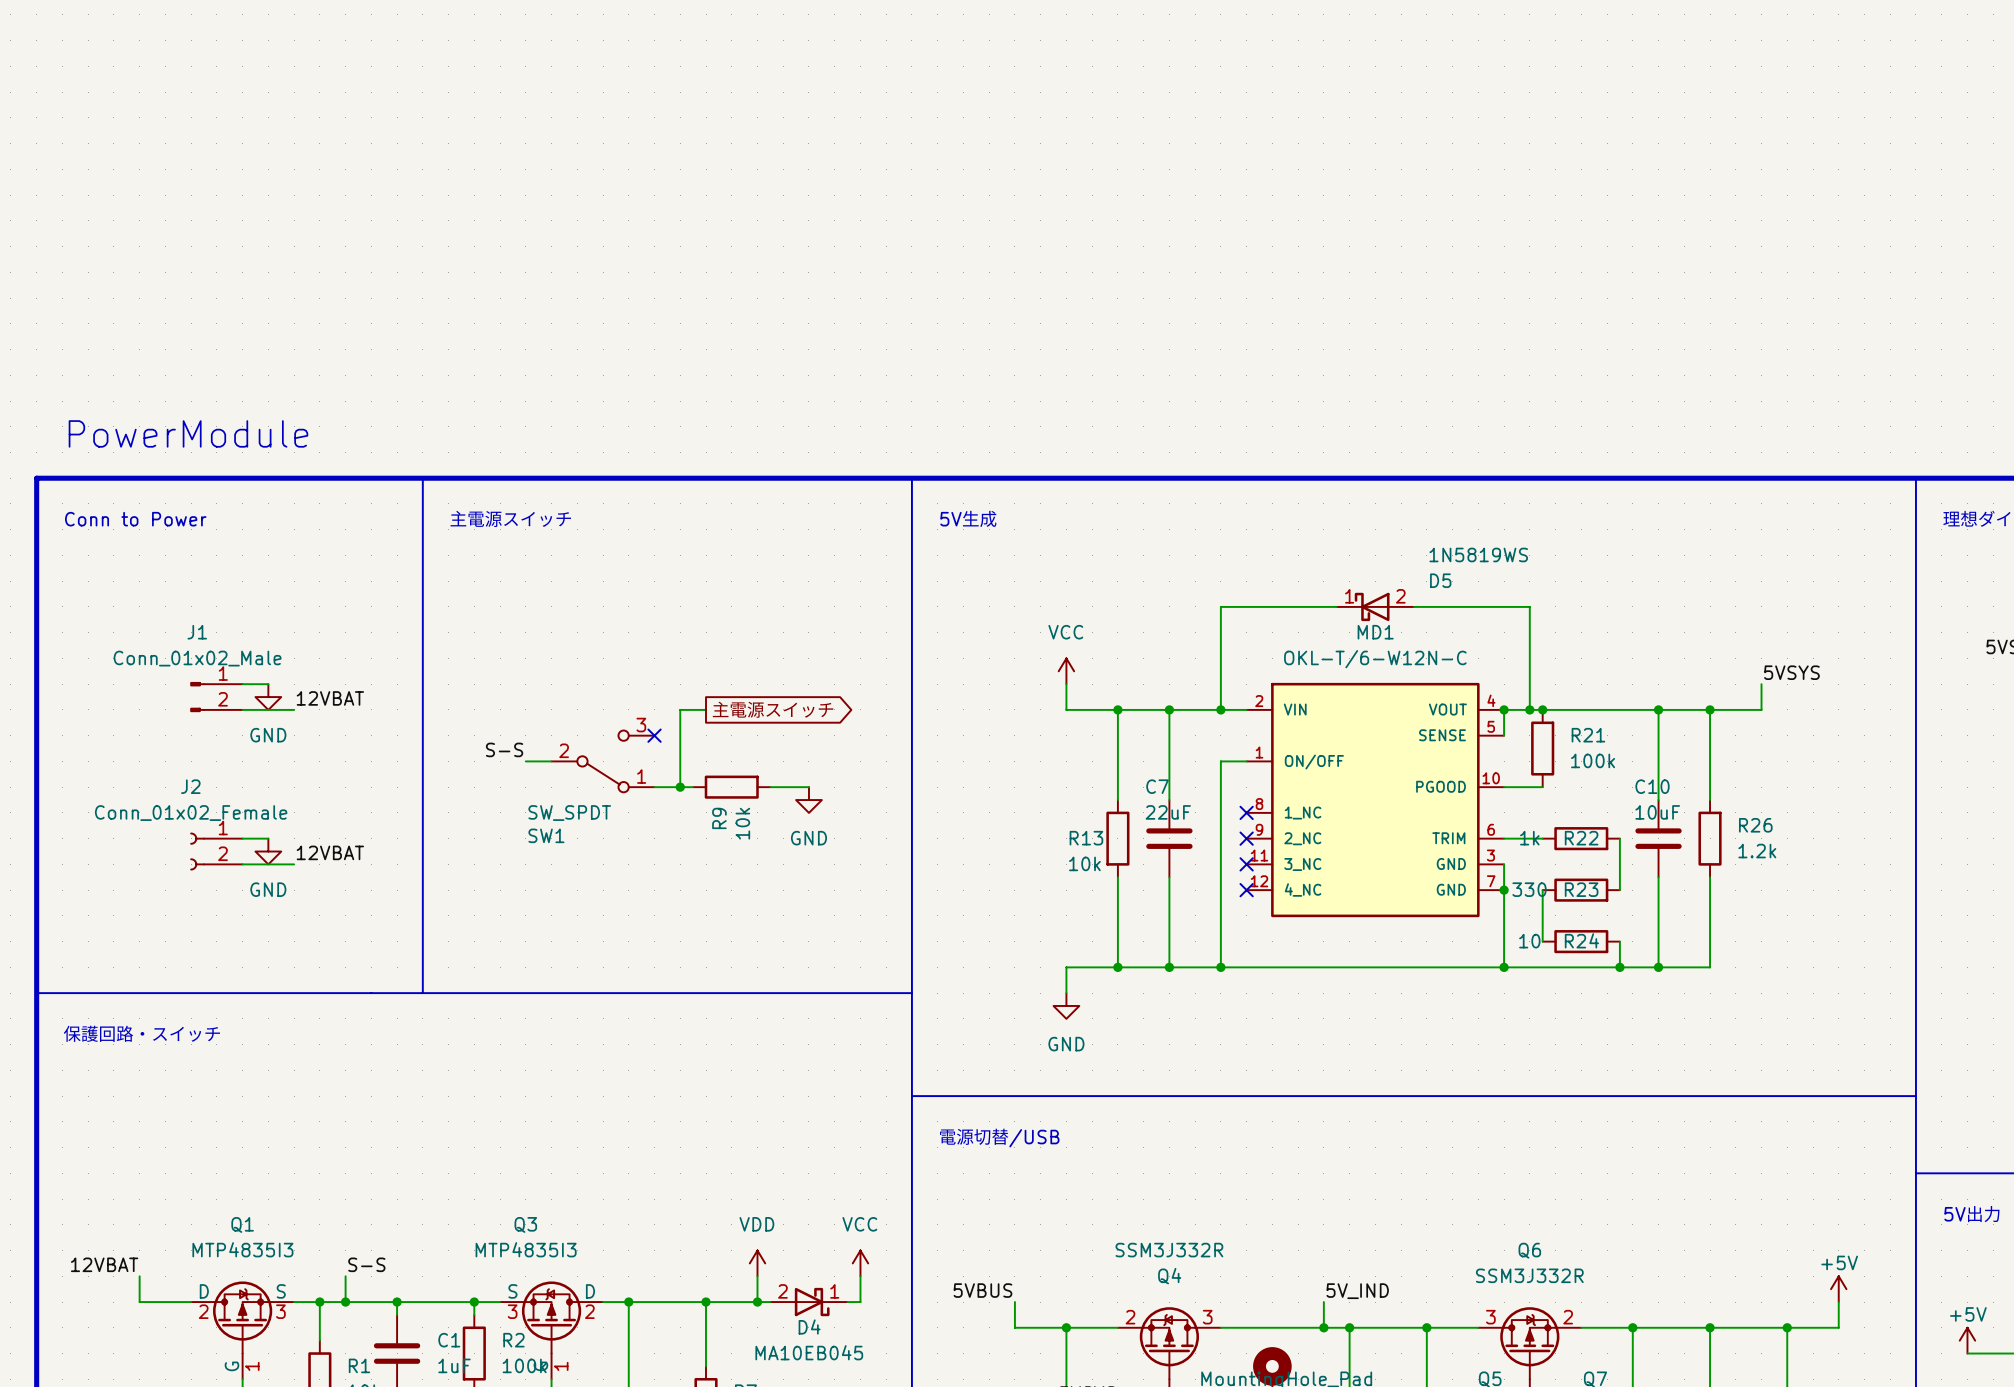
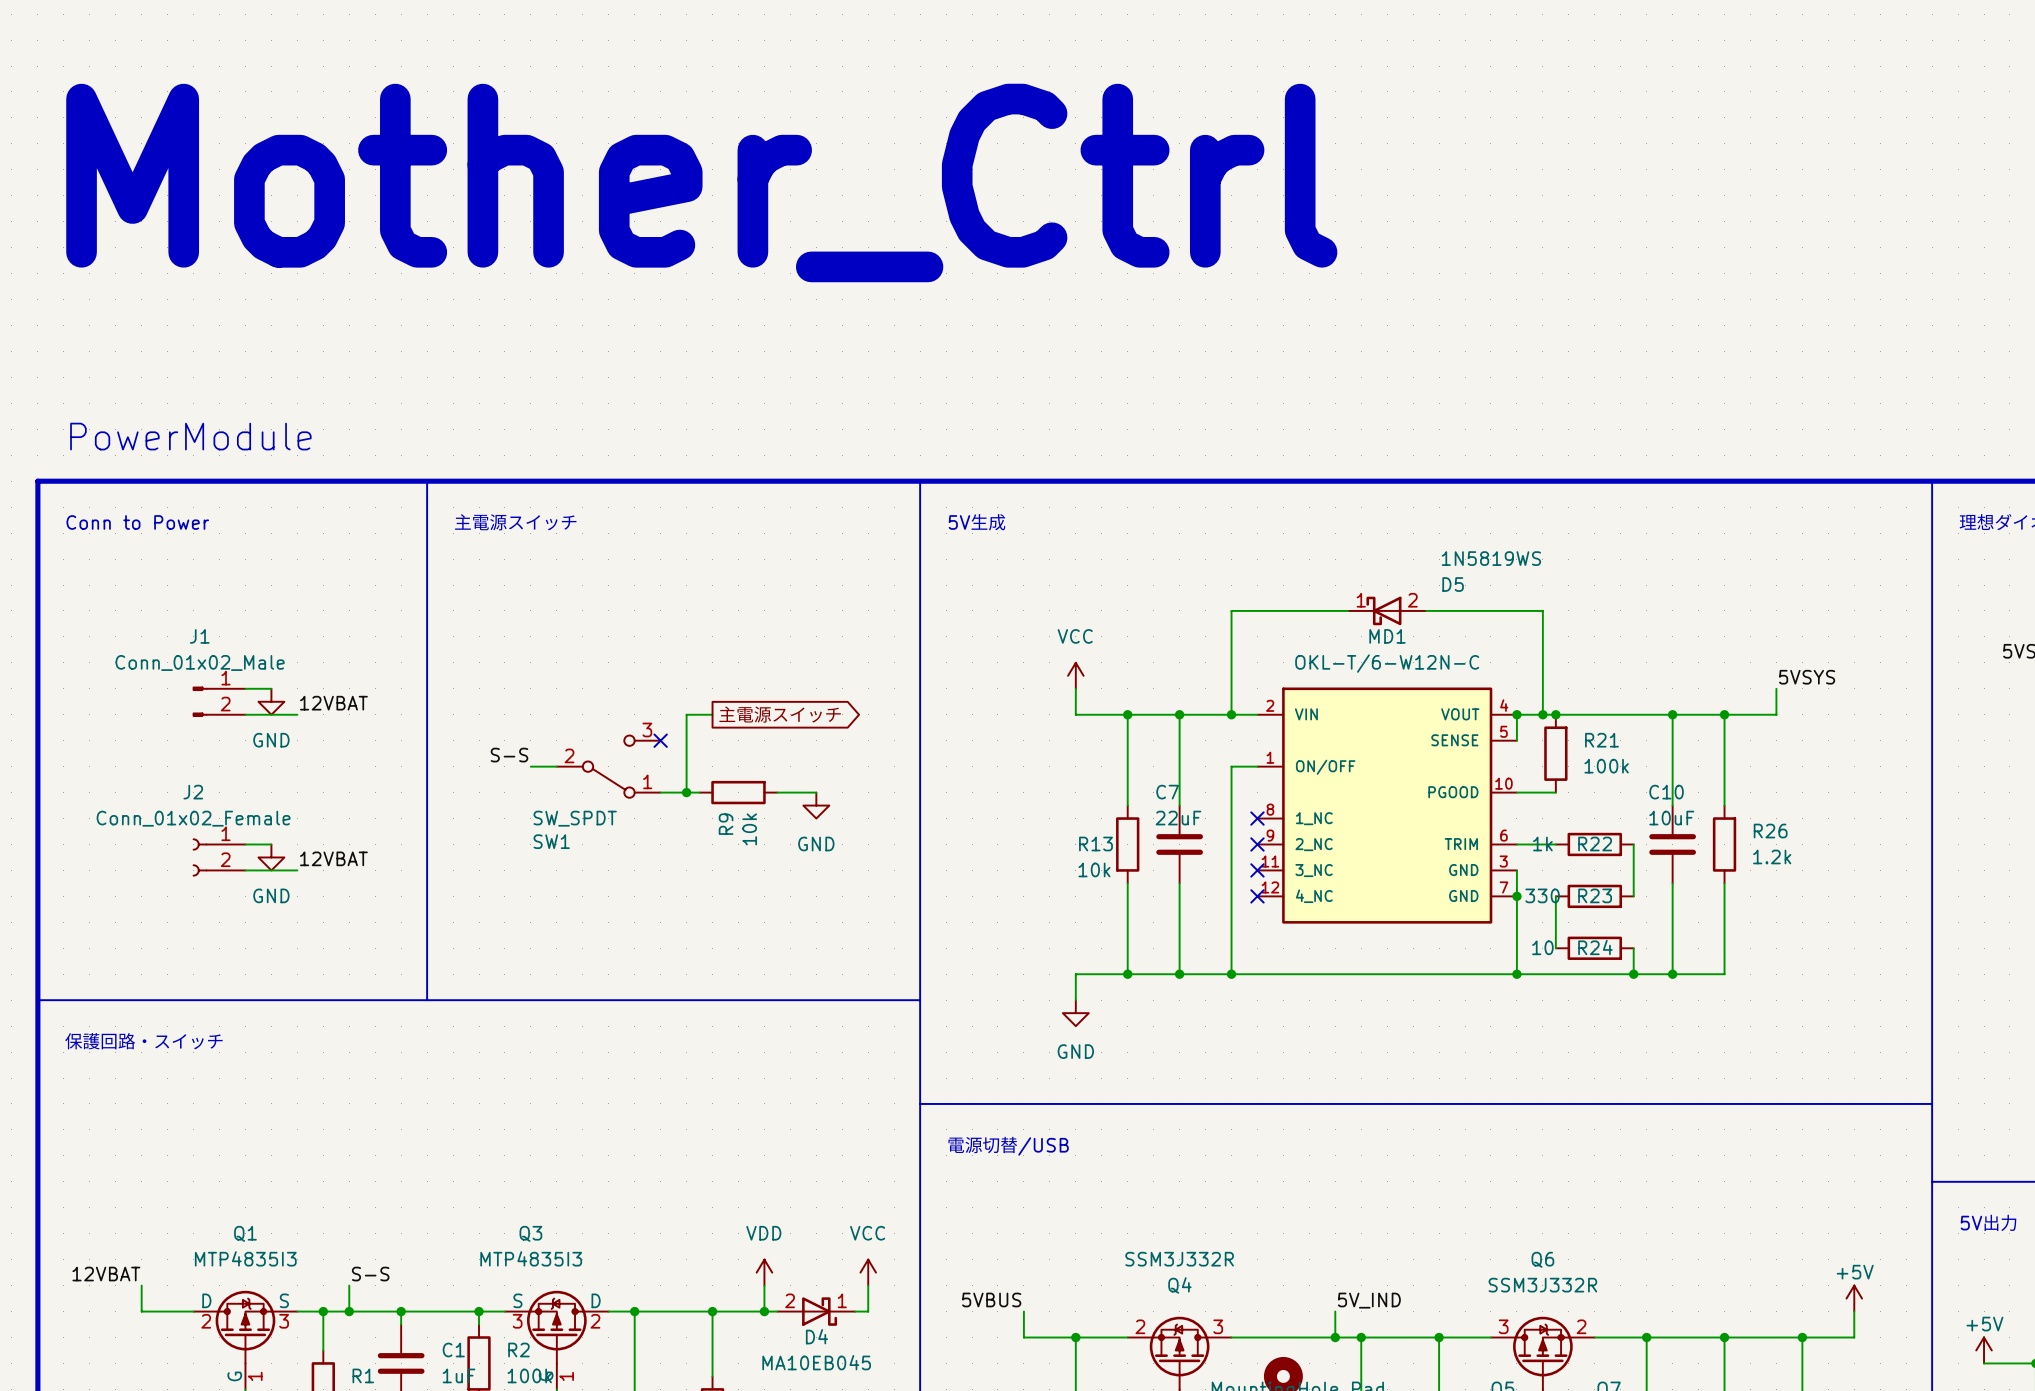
text: none -> Mother_Ctrl (701, 182)

